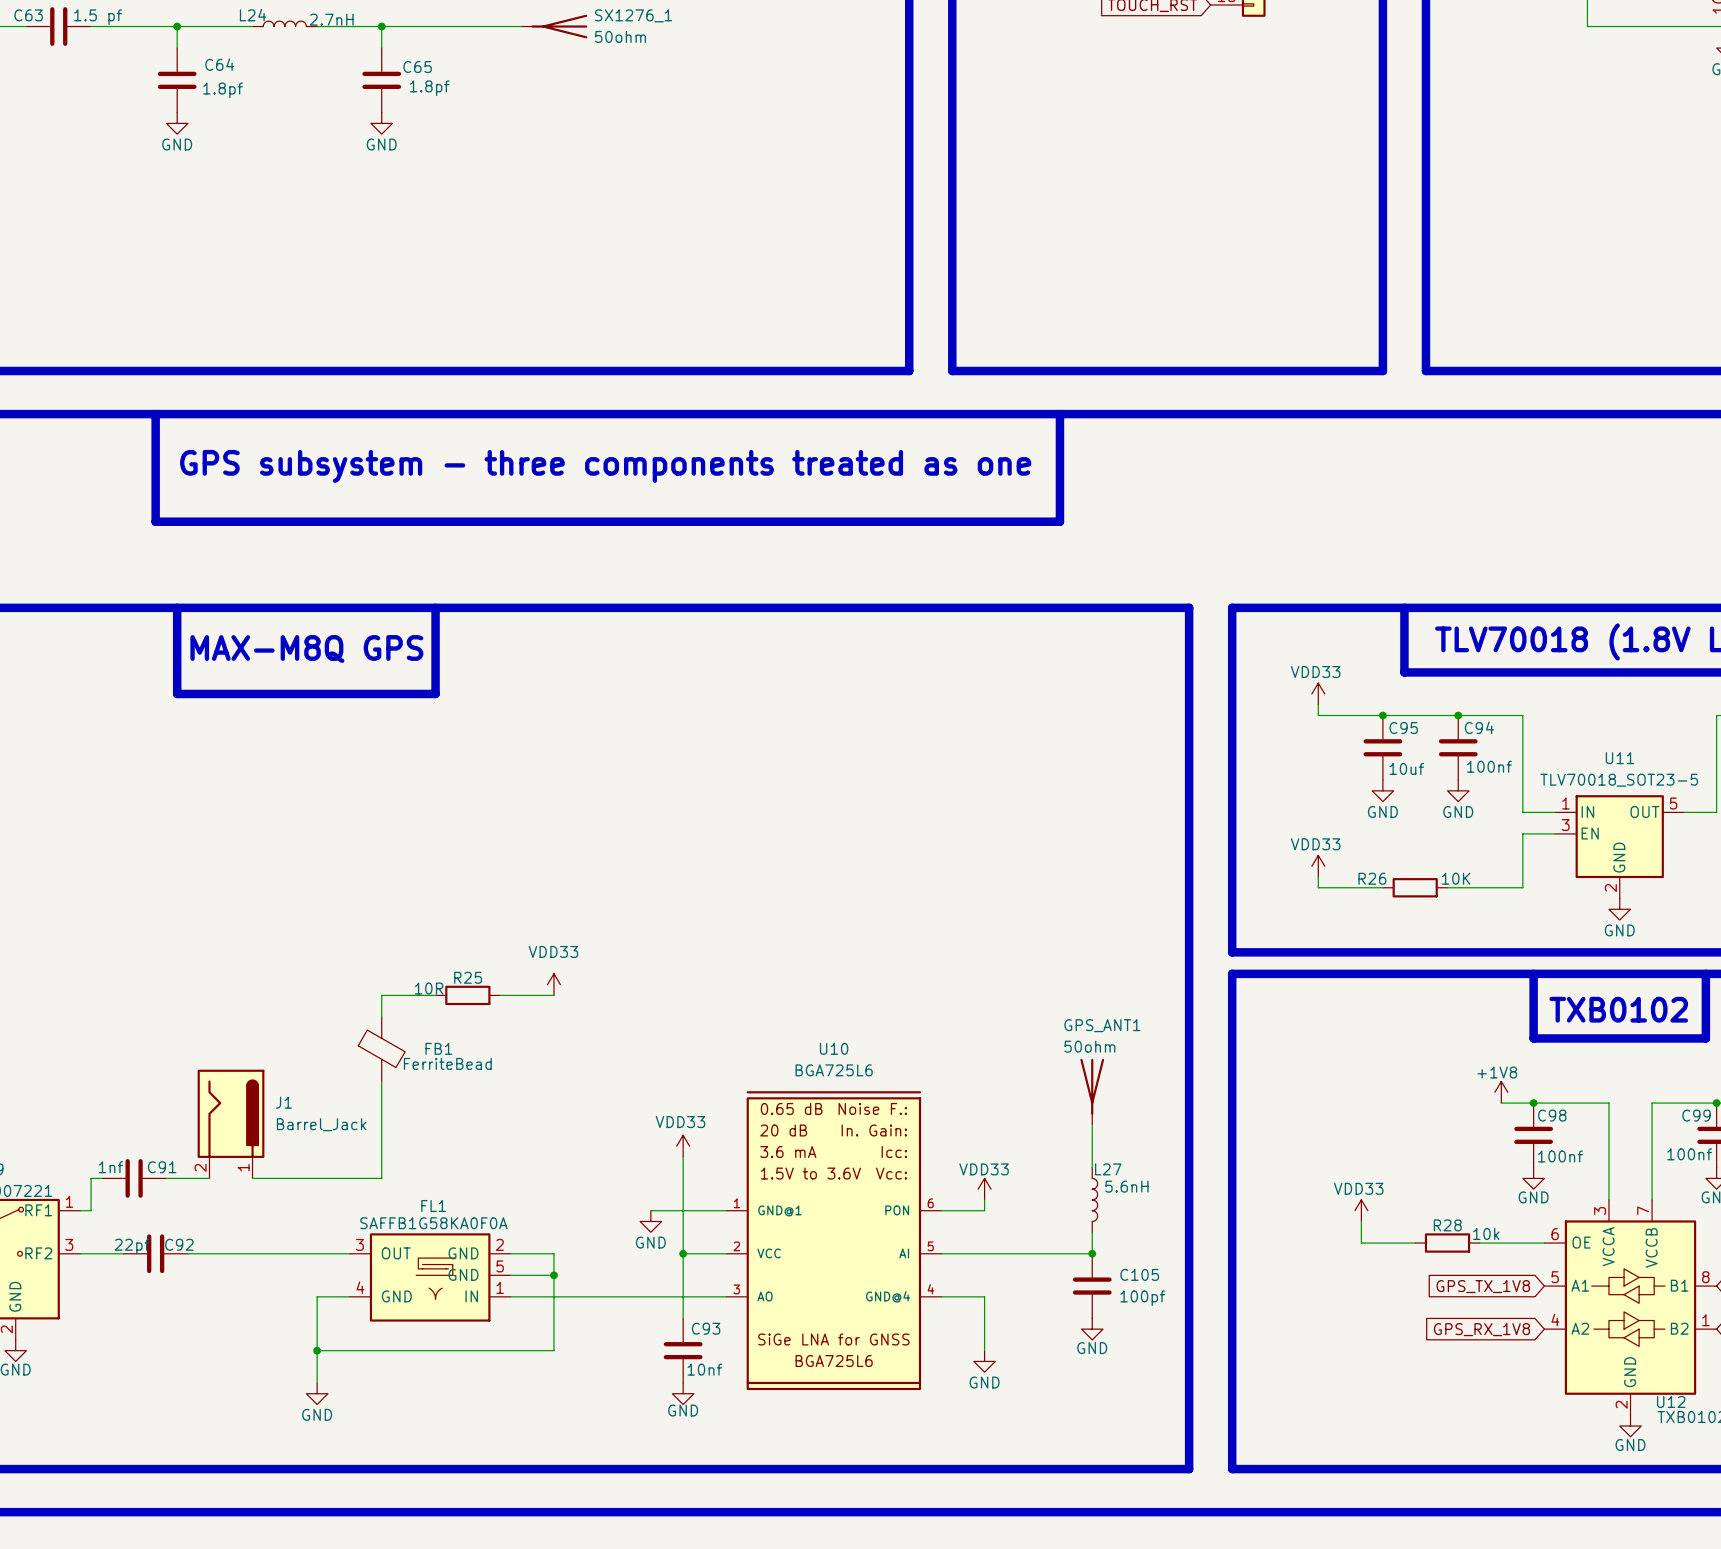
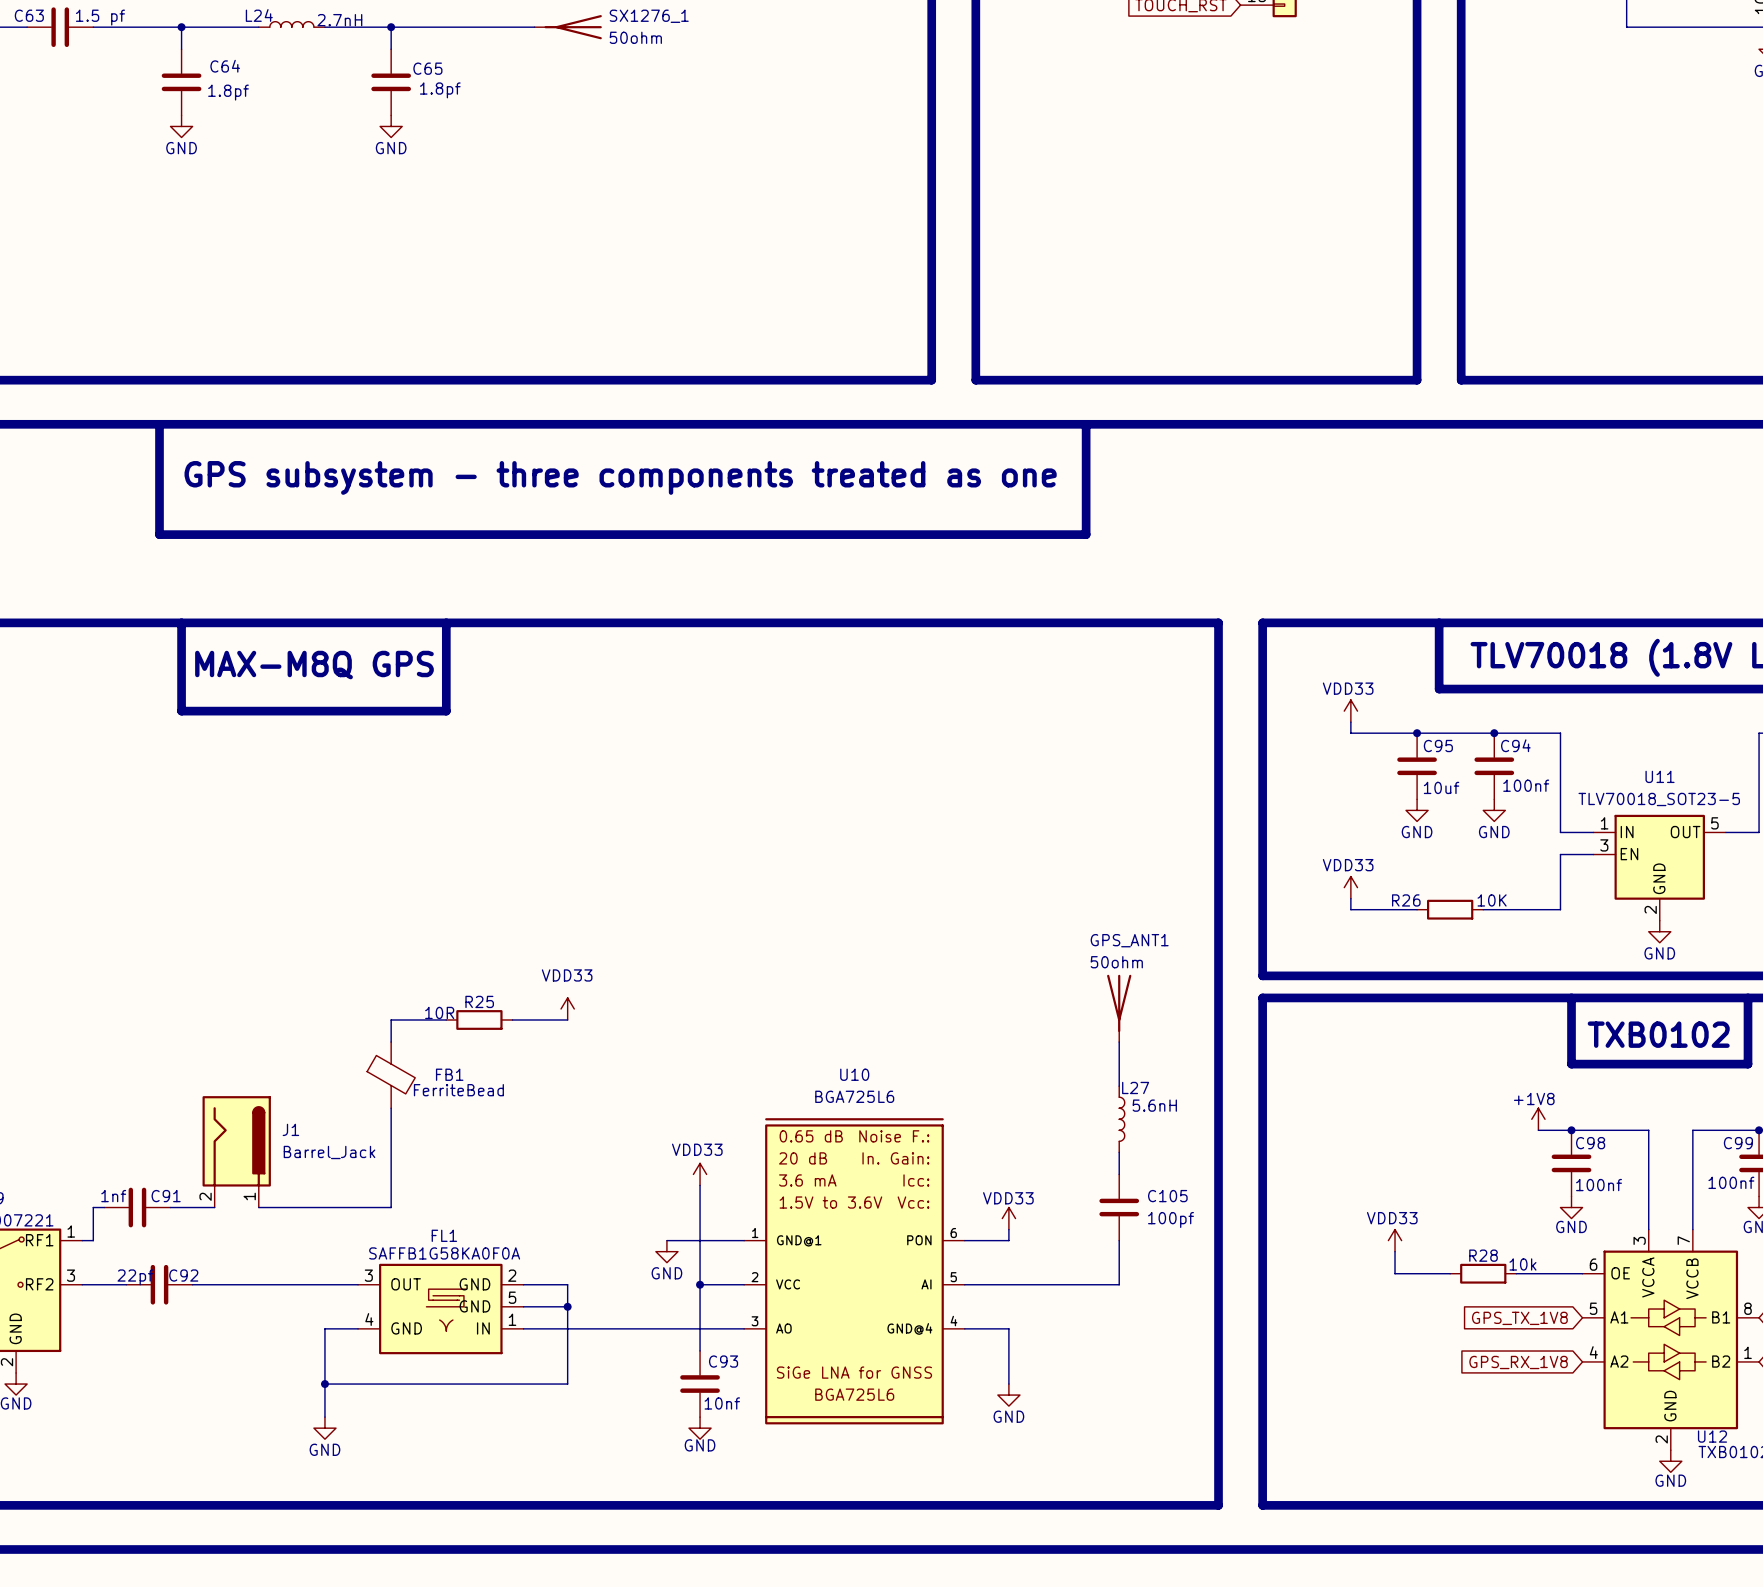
wire: none -> (1119, 1042) (1119, 1086)
GPS_ANT1 position: (1092, 1091) -> (1119, 1008)
L27 position: (1094, 1199) -> (1121, 1119)
junction: (1092, 1253) -> none
C105 position: (1092, 1286) -> (1119, 1207)
power symbol: GND (1092, 1329) -> none

